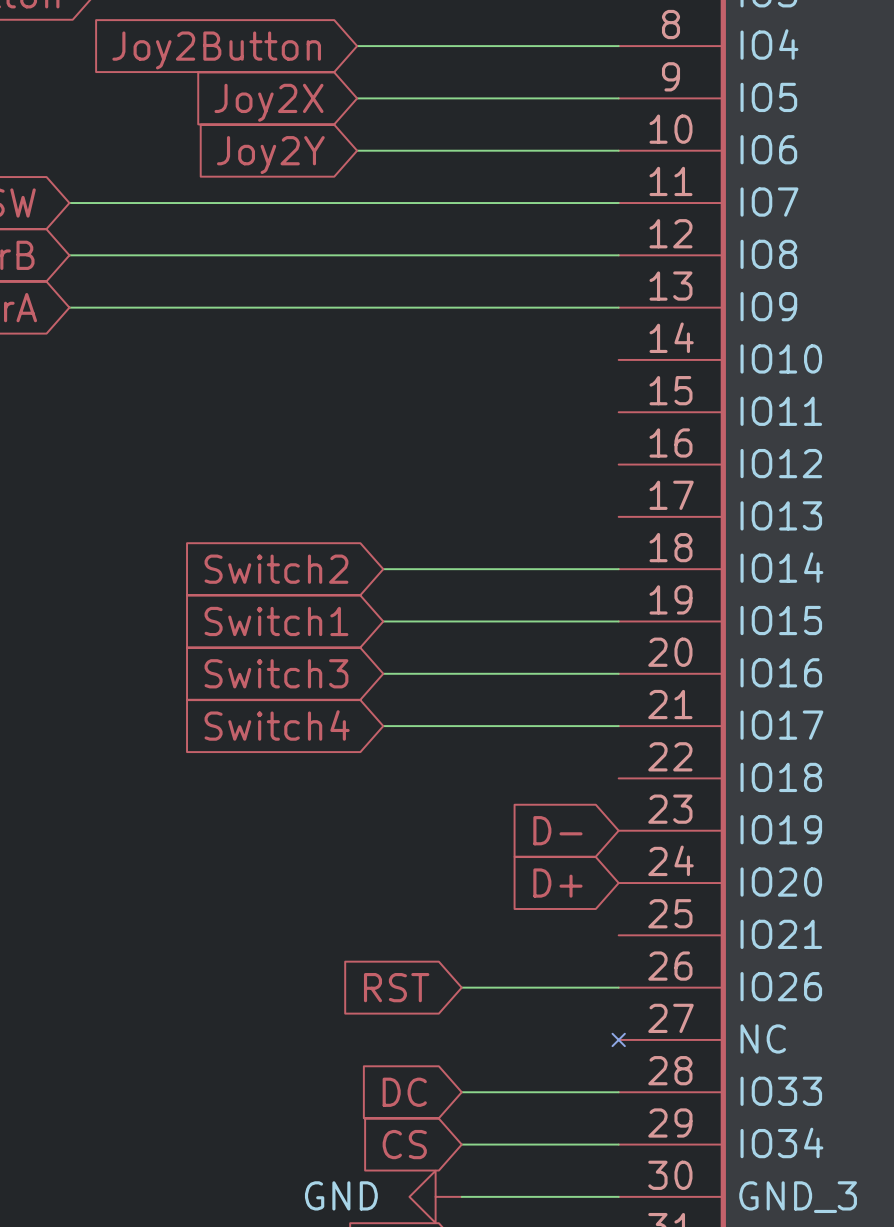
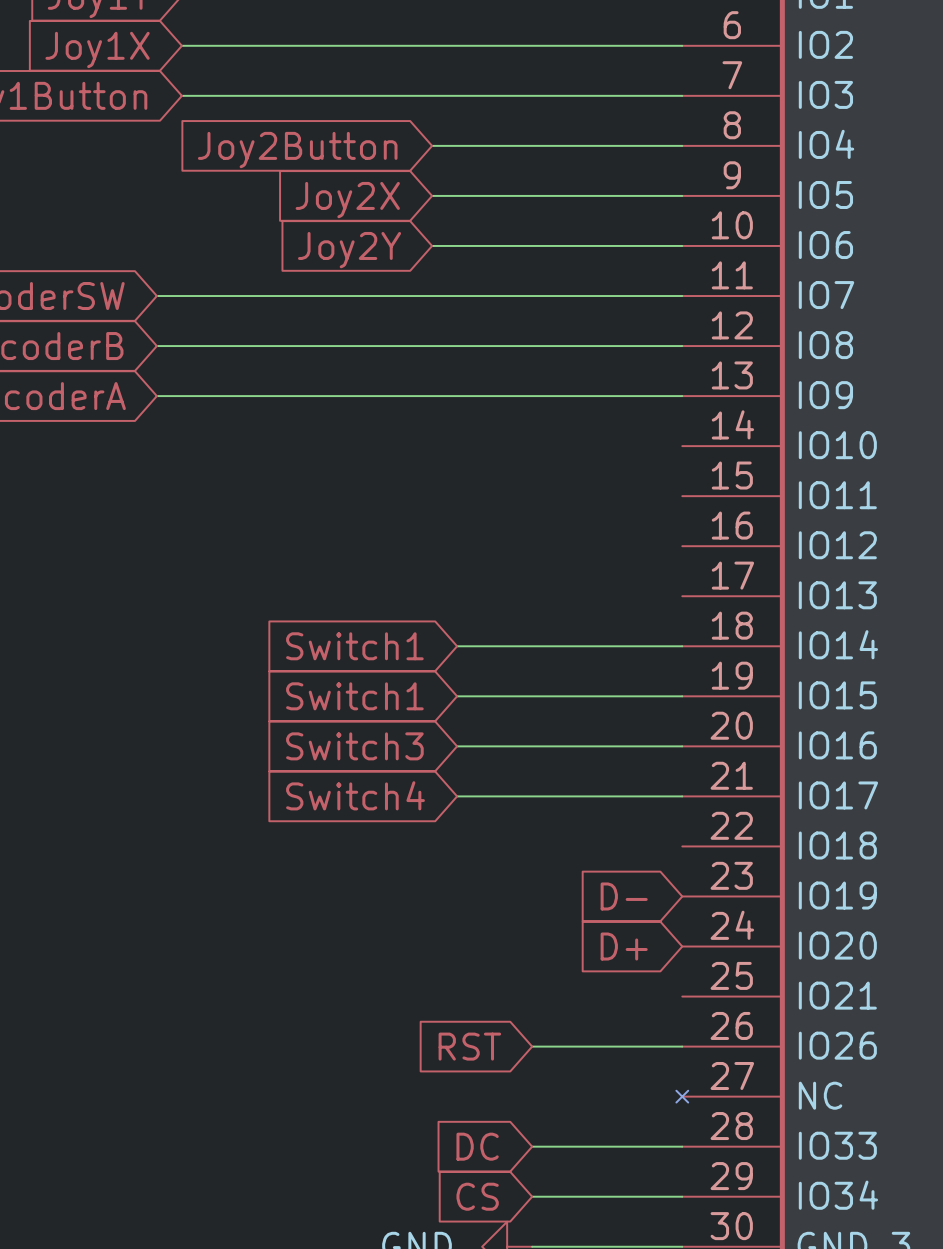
global label: Switch2 (276, 569) -> Switch1 (354, 646)

